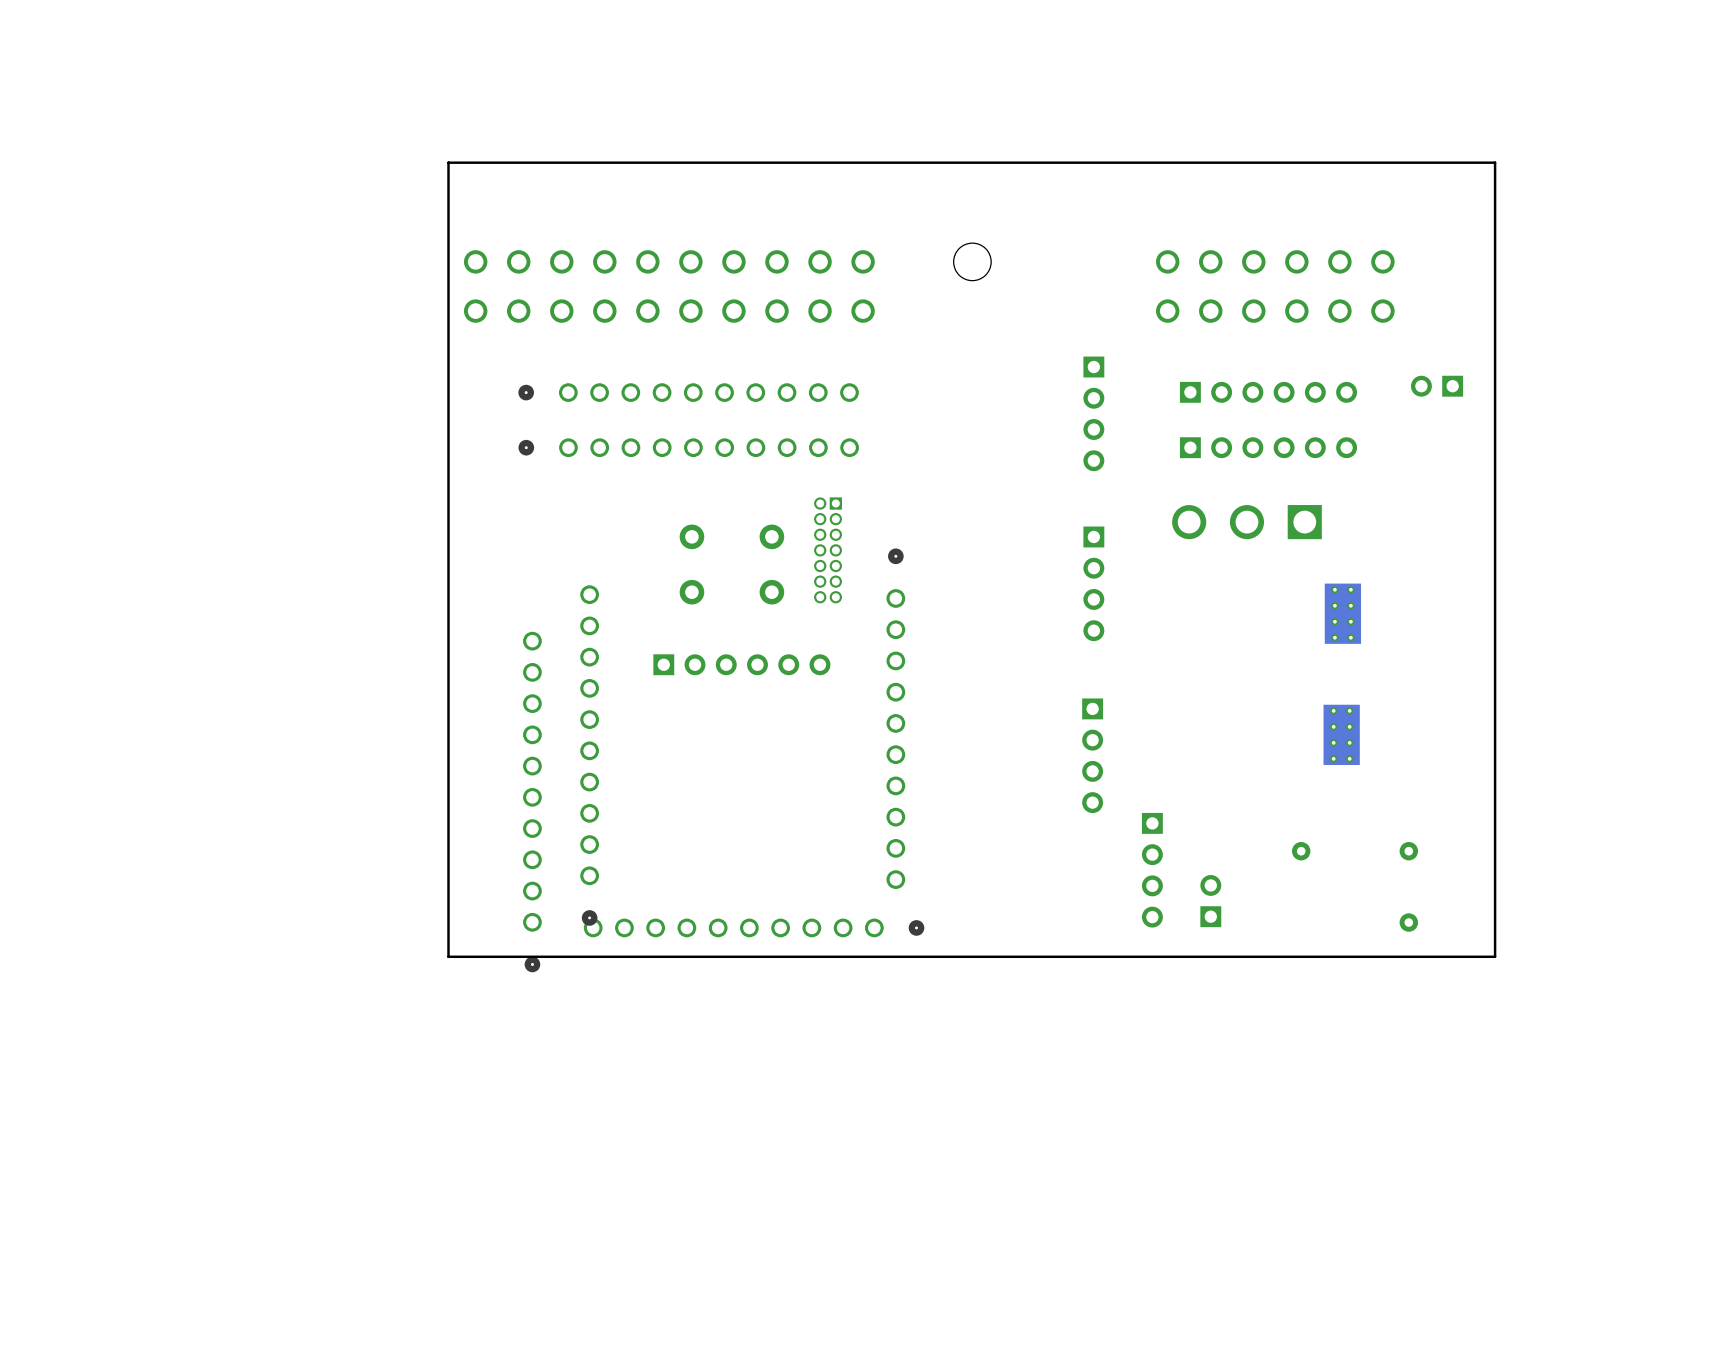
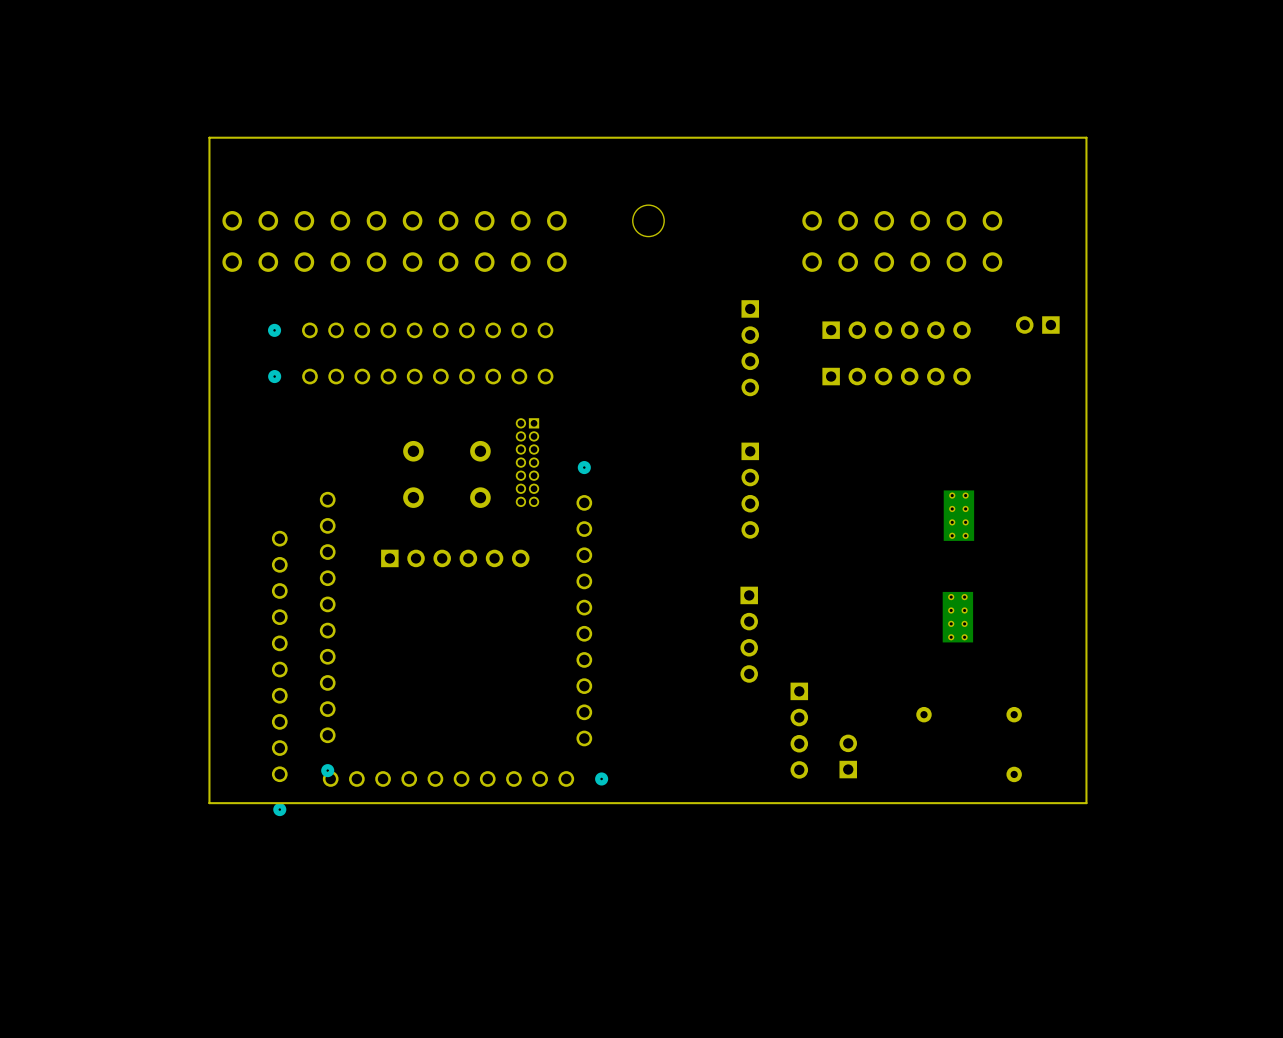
part: (1246, 522) -> none

